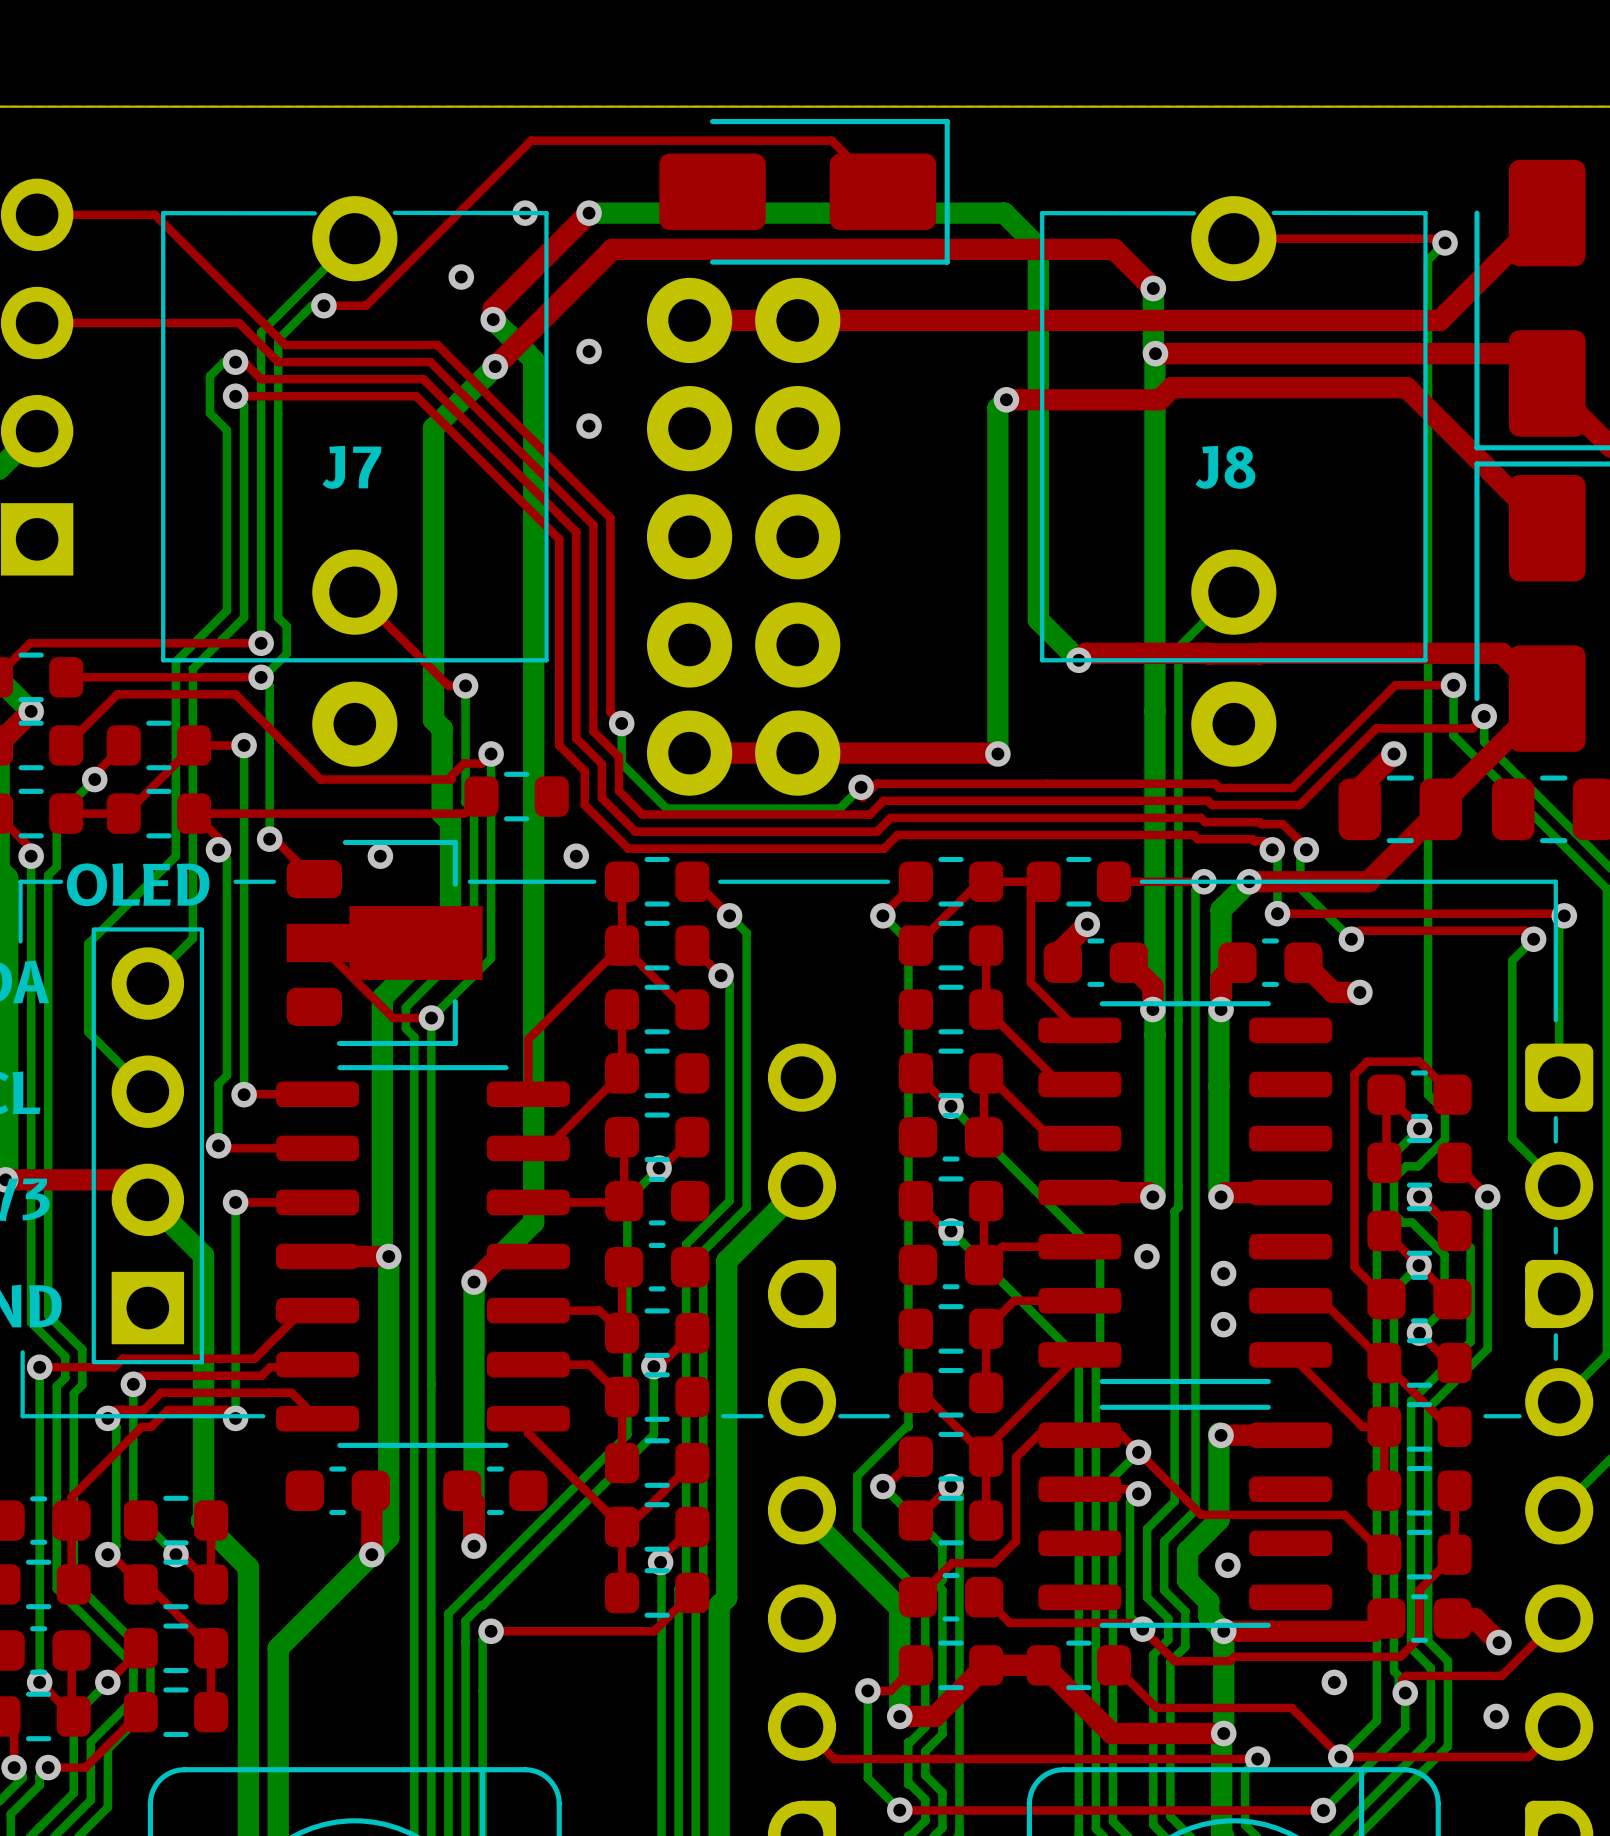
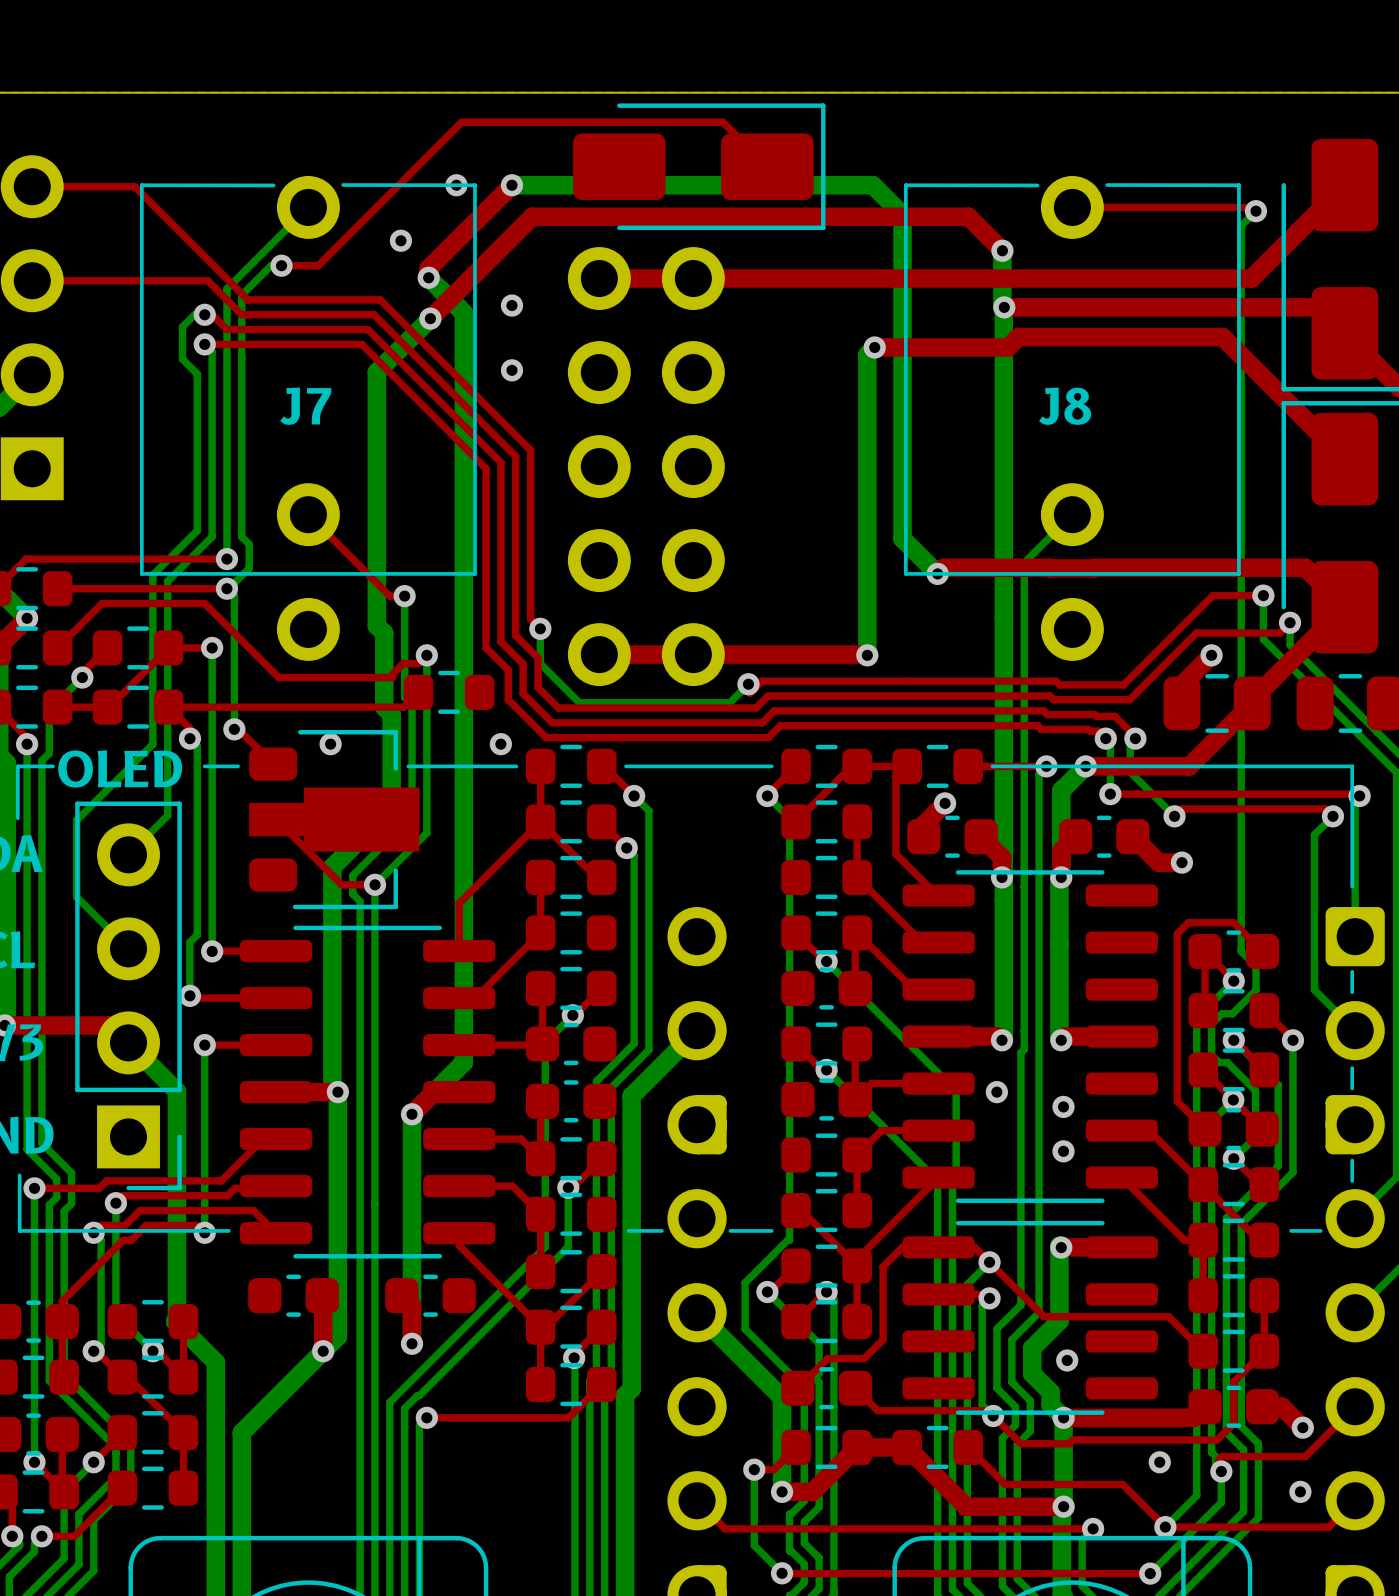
part footprint: [161, 196, 549, 767] -> [139, 175, 477, 661]
part footprint: [1040, 196, 1428, 767] -> [903, 175, 1241, 661]
part footprint: [646, 277, 841, 796] -> [567, 247, 725, 687]
part footprint: [91, 927, 205, 1365] -> [75, 801, 182, 1191]

